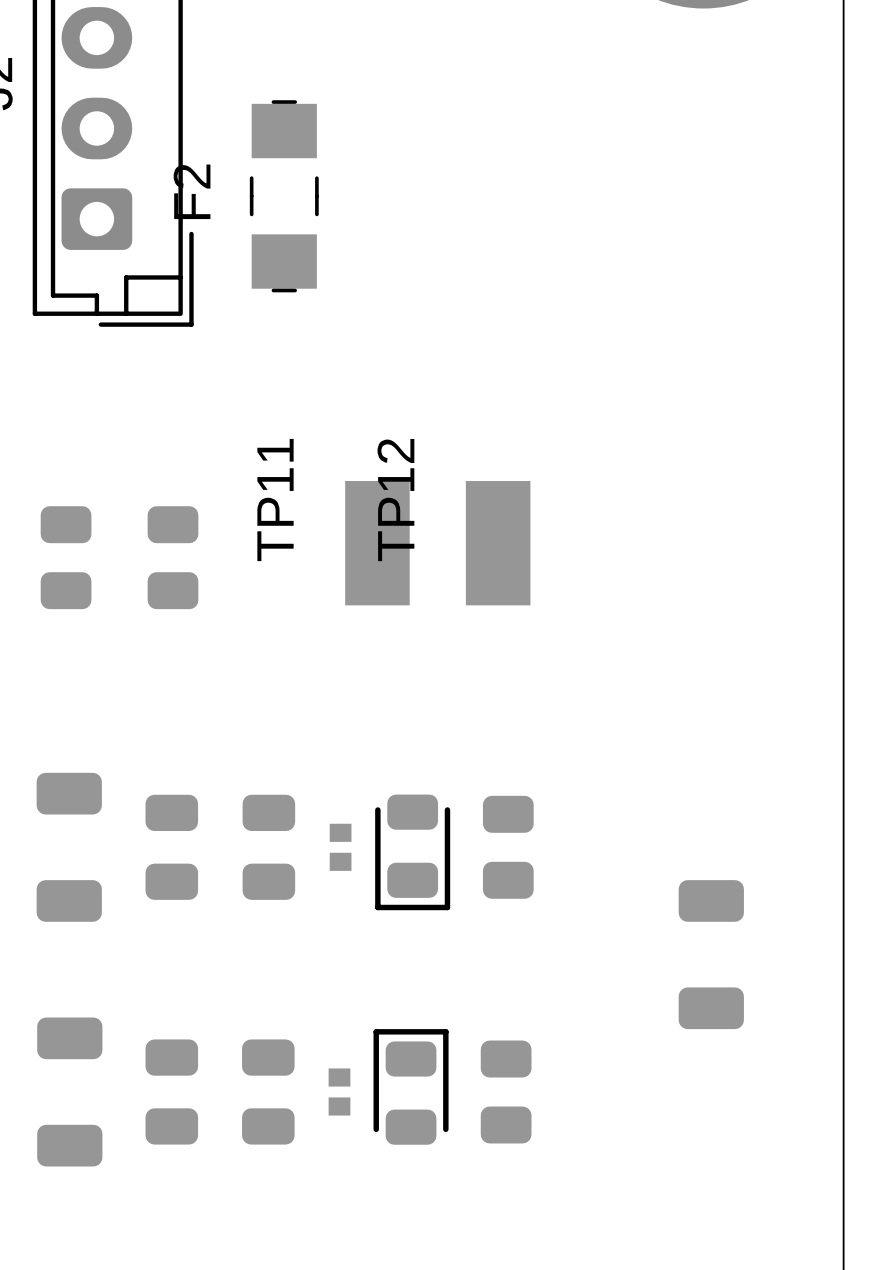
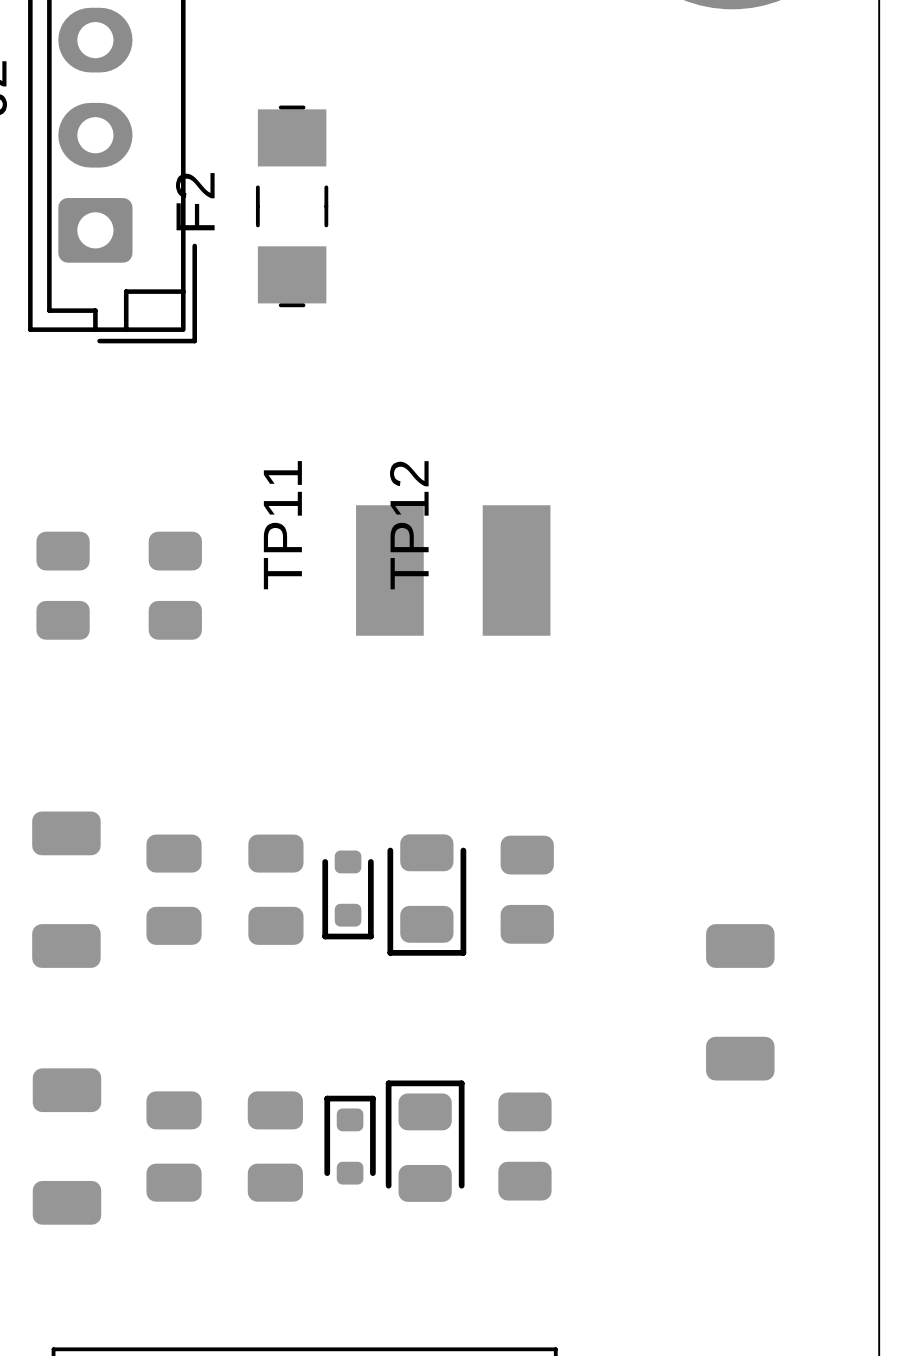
part footprint: [329, 823, 352, 871] -> [322, 850, 374, 940]
part footprint: [328, 1068, 351, 1116] -> [324, 1095, 376, 1185]

